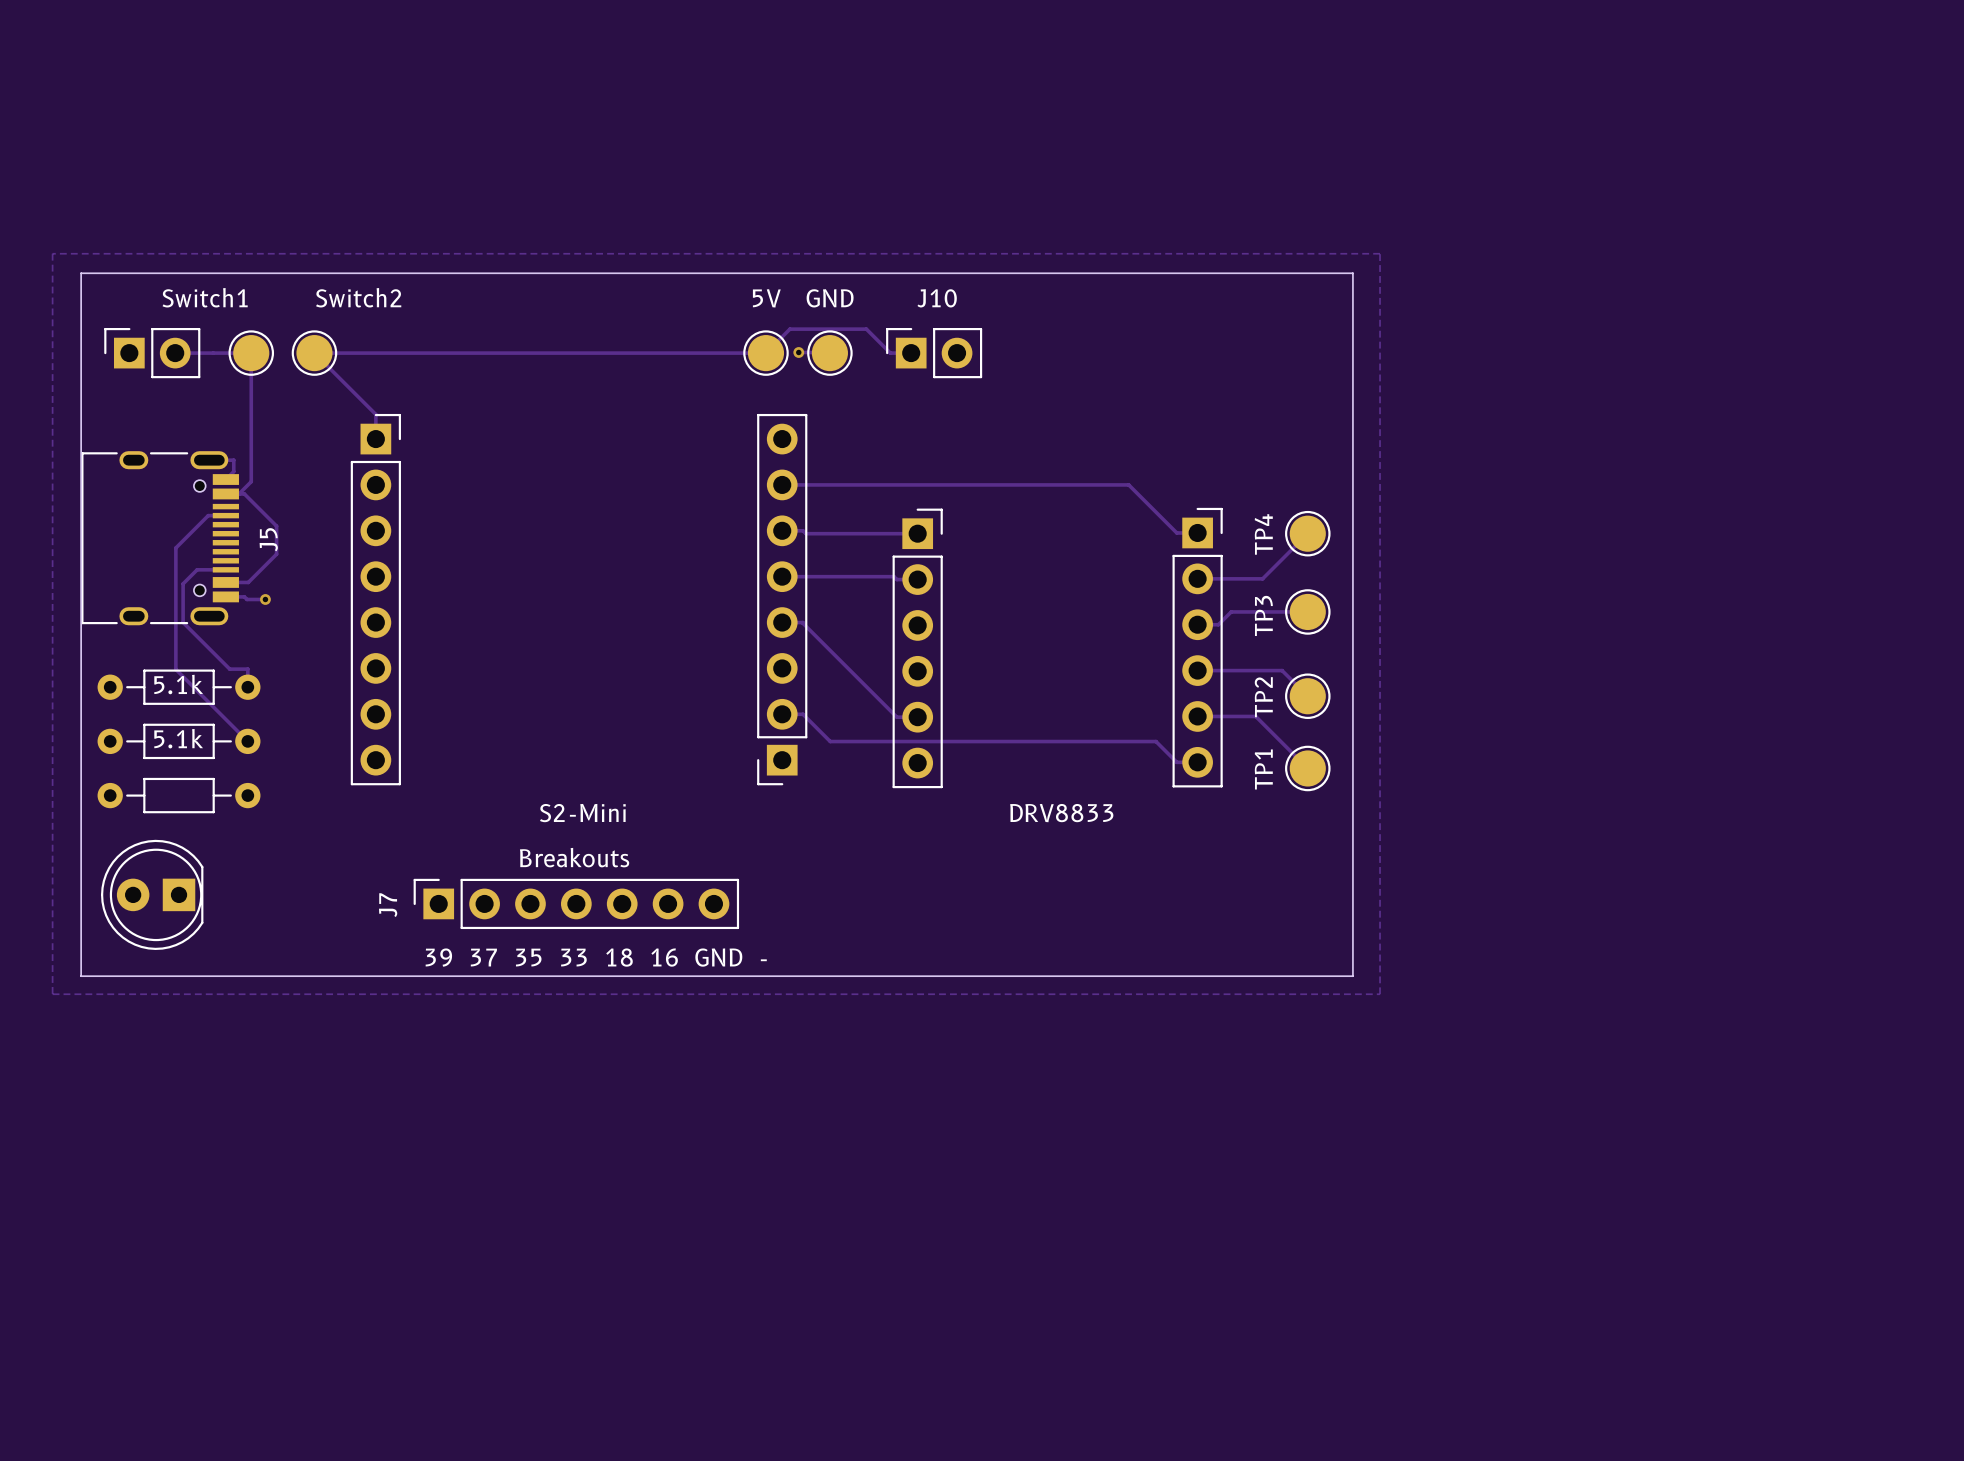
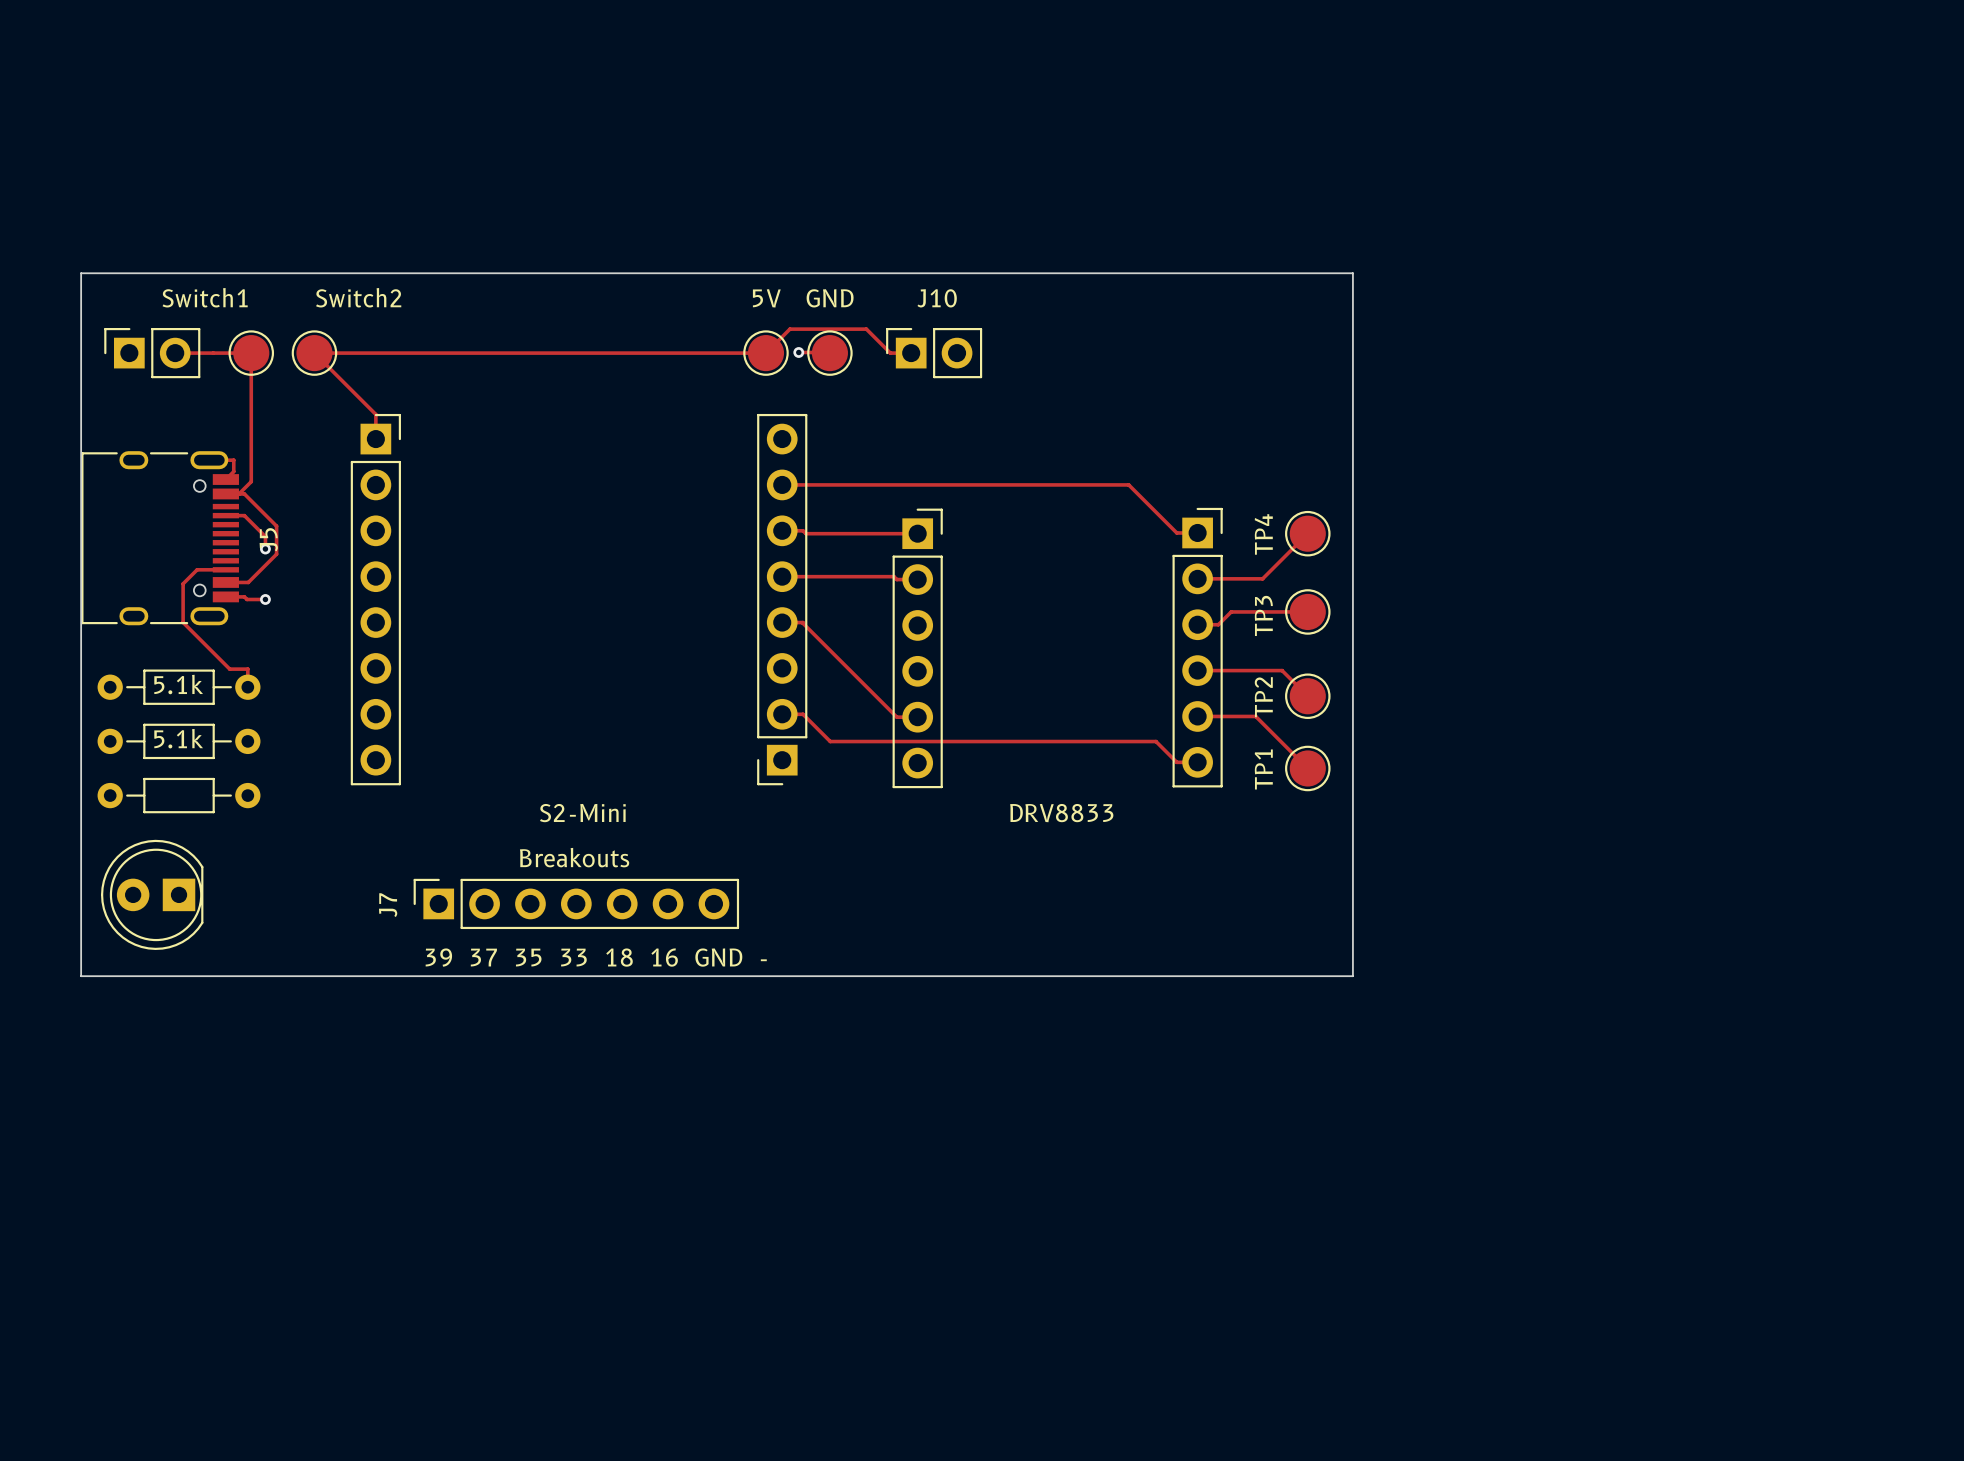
zone outline: (52, 253) (52, 994) (1380, 994) (1380, 253) (52, 253) -> none
track: (225, 515) (208, 515) (175, 548) (175, 669) (247, 741) -> (225, 515) (244, 515) (265, 536) (265, 549)
via: none -> (265, 549)

